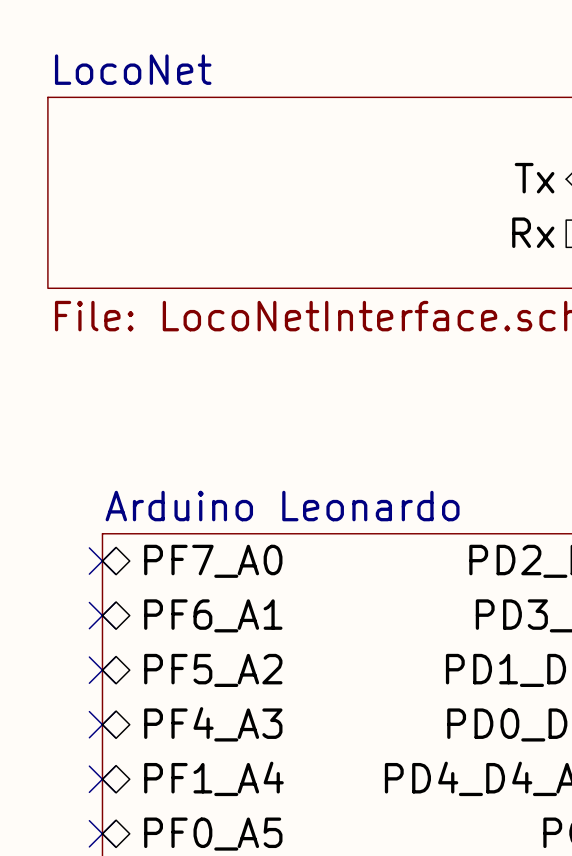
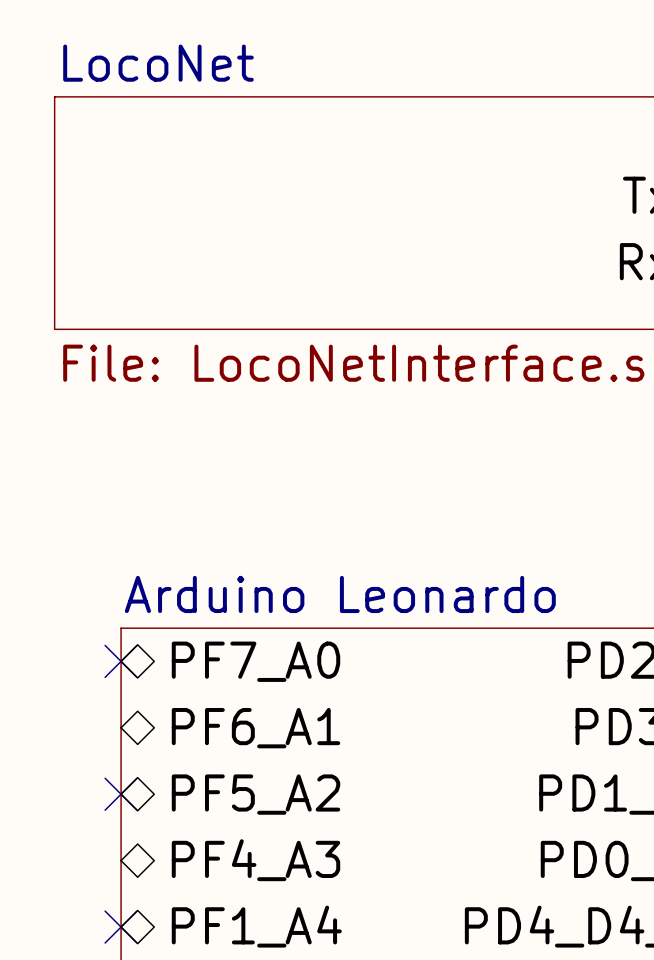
no-connect mark: (102, 615) -> none
no-connect mark: (102, 724) -> none

